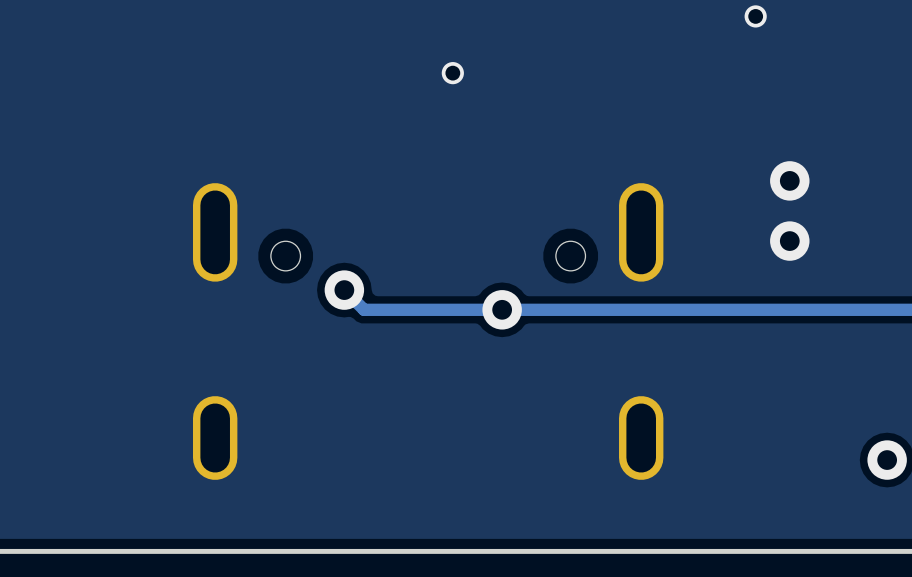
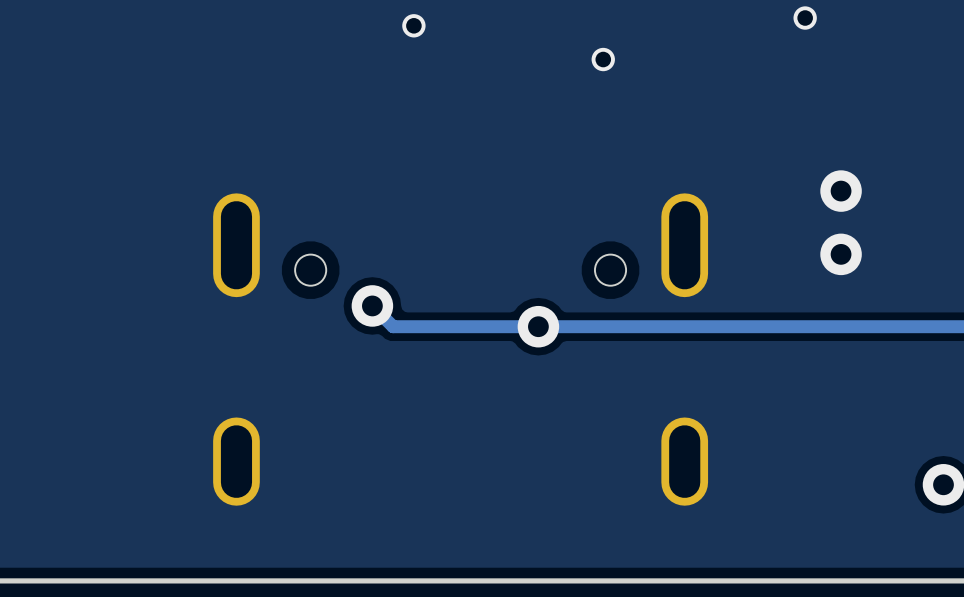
via: none -> (413, 25)
via: none -> (603, 59)
via: (452, 73) -> none

